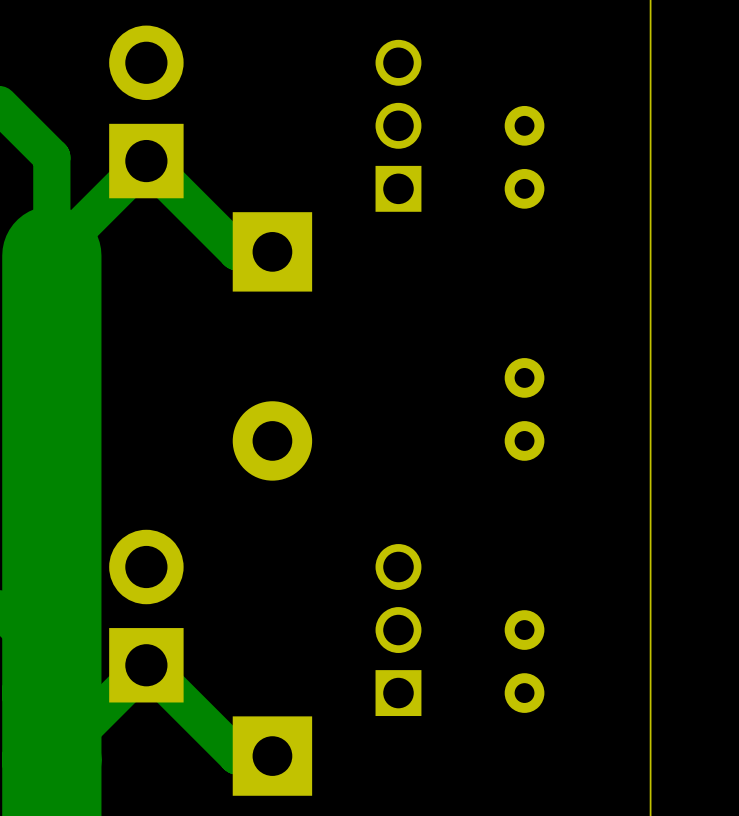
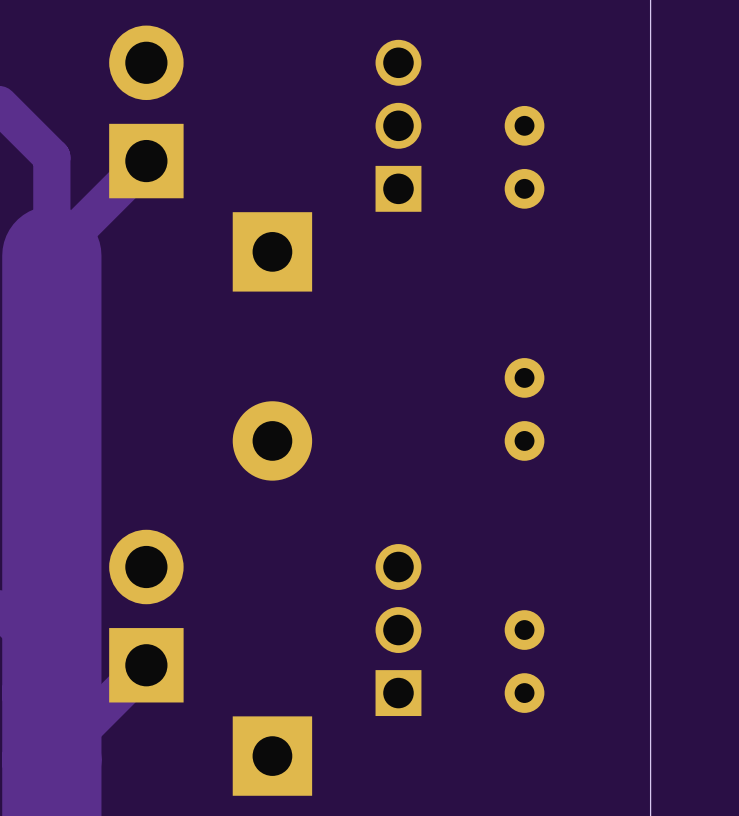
track: (146, 161) (237, 251) (272, 251) -> none
track: (146, 665) (237, 756) (272, 756) -> none

